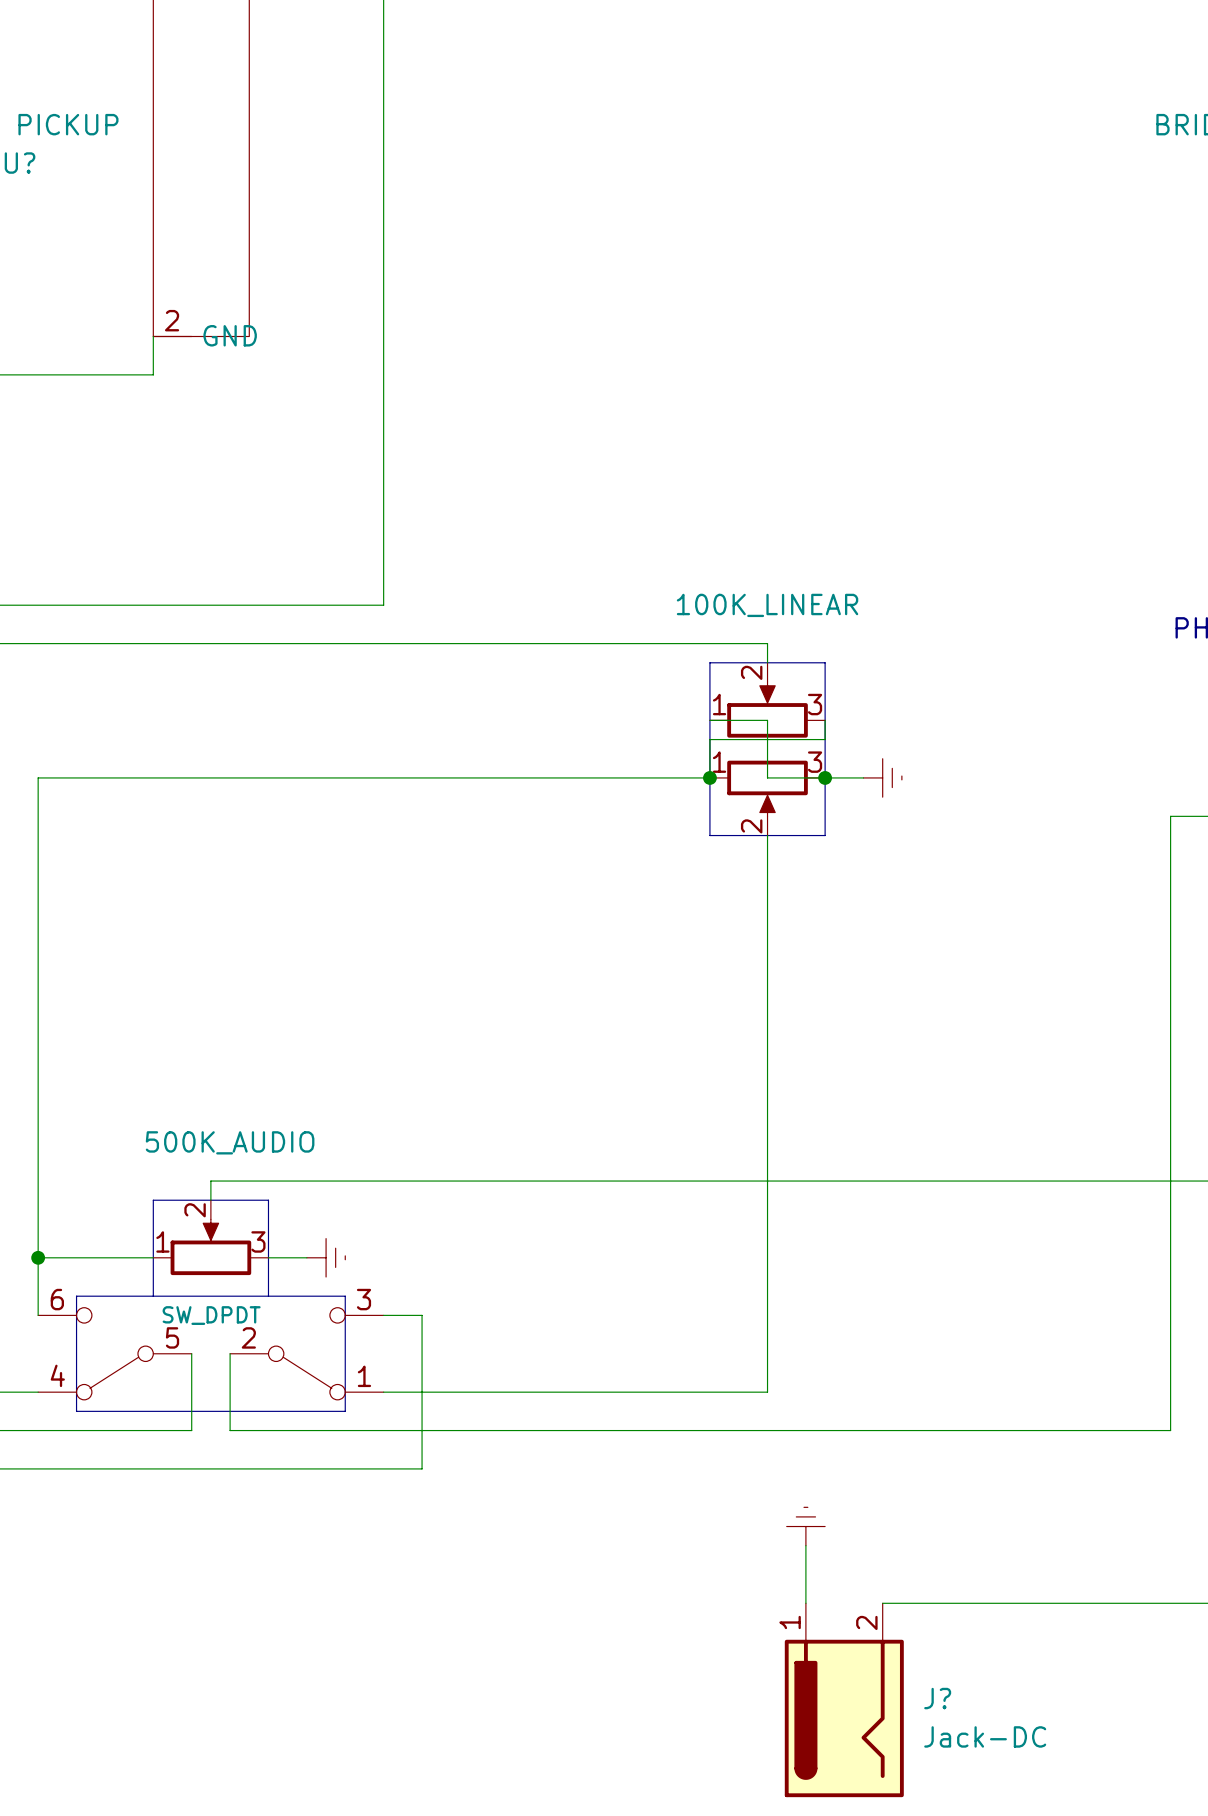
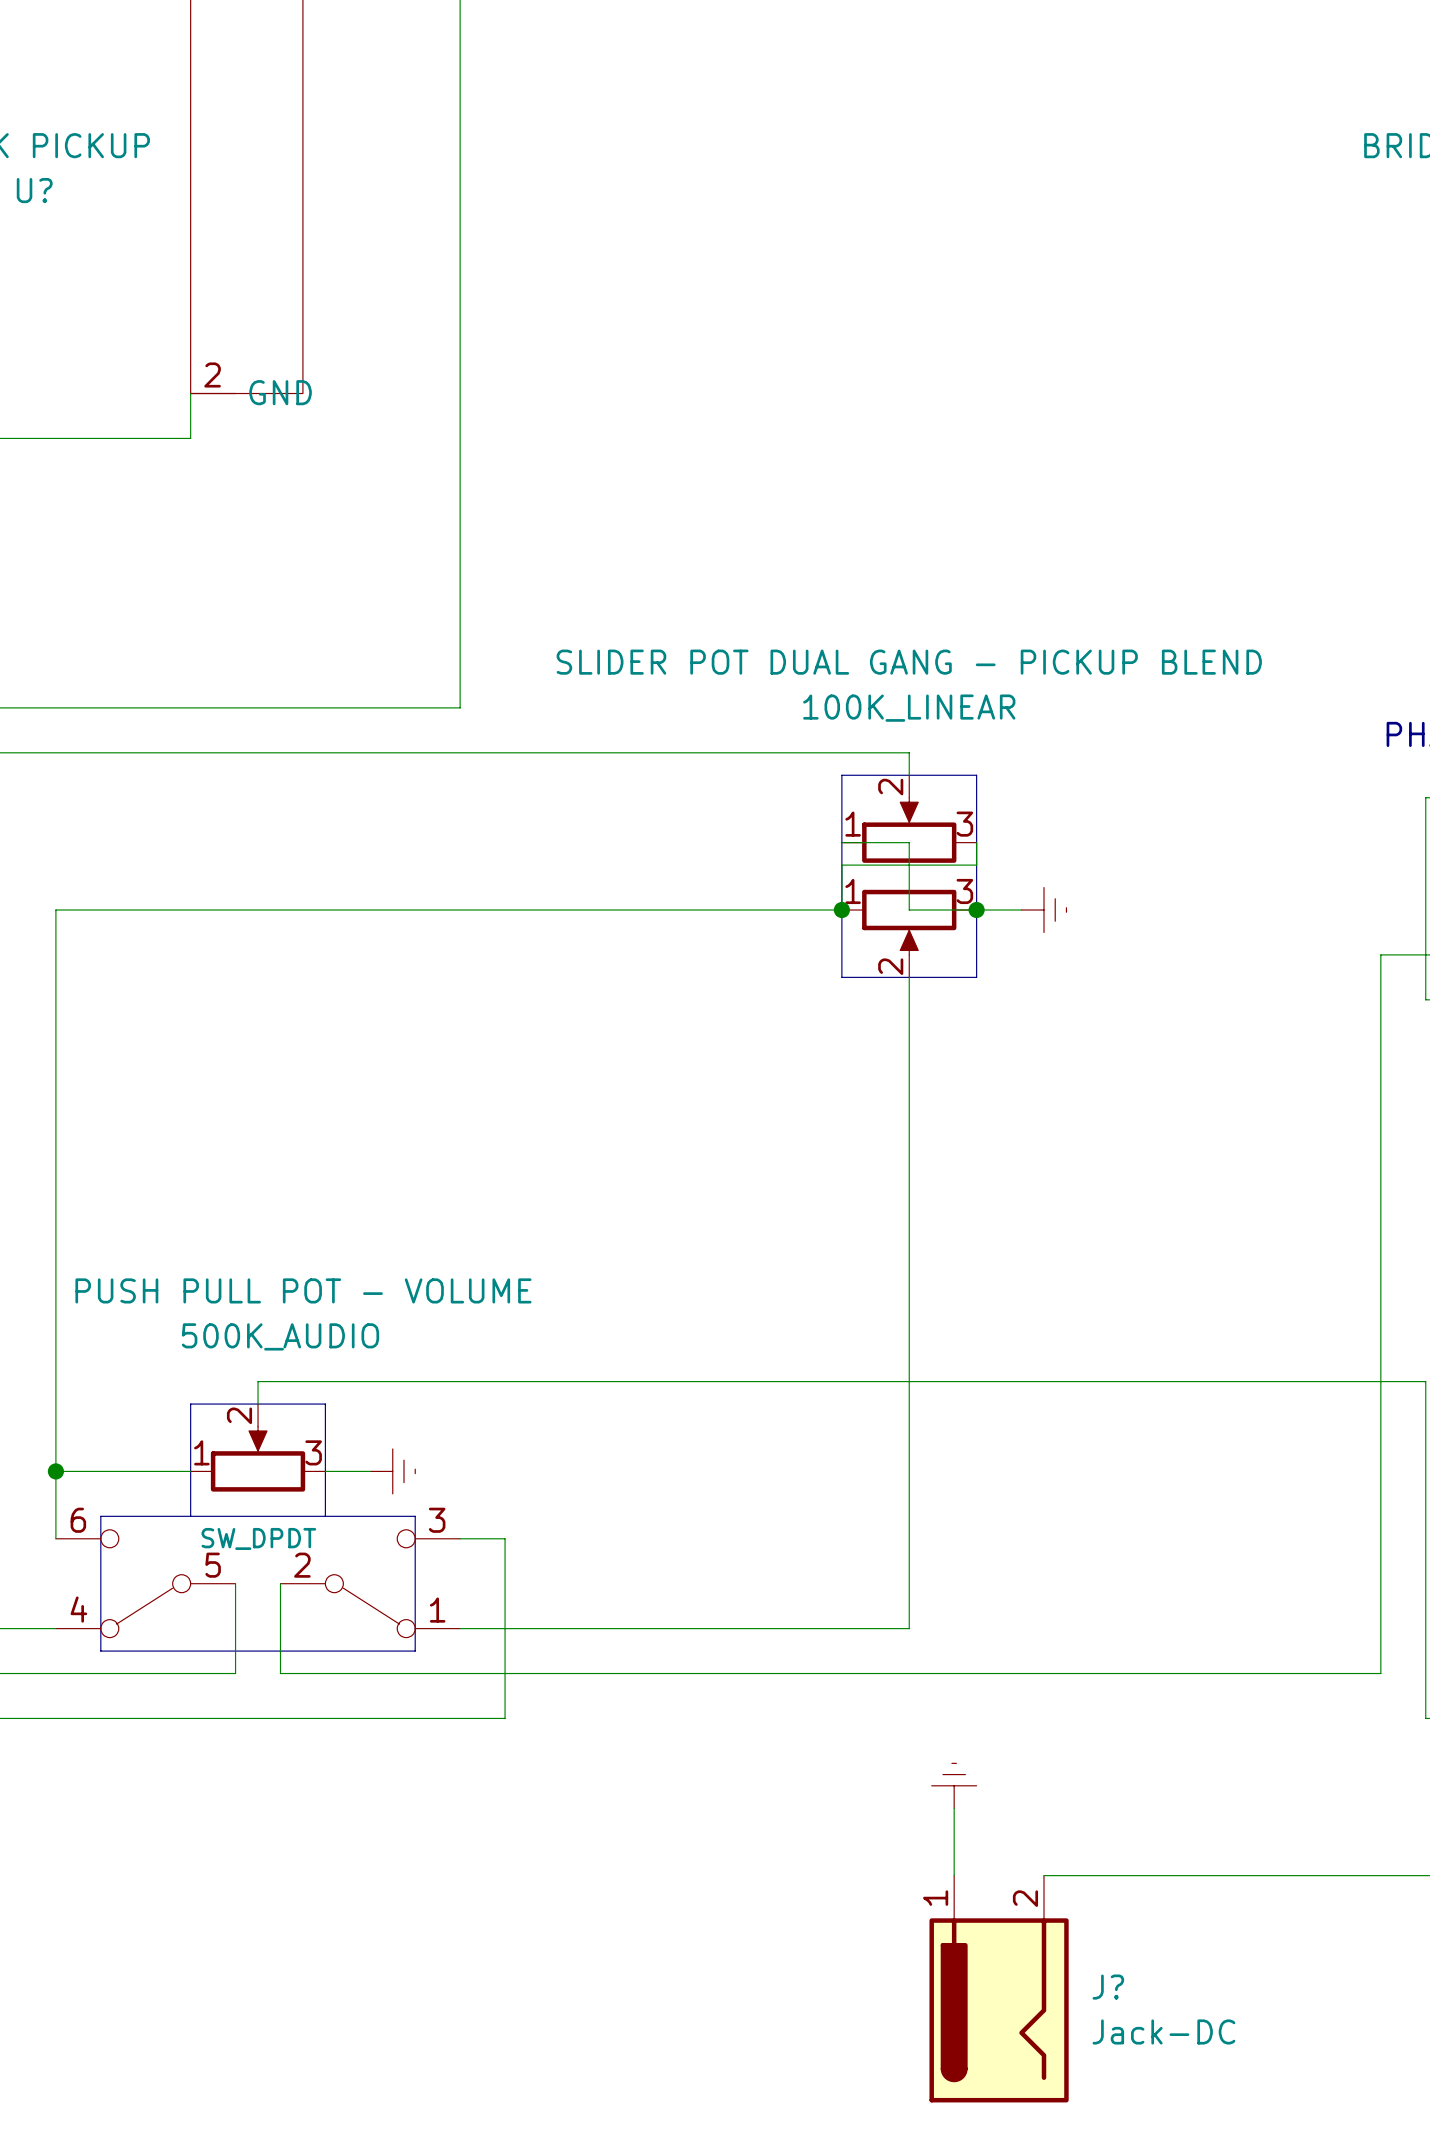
100K_LINEAR value: none -> SLIDER POT DUAL GANG - PICKUP BLEND (909, 662)
500K_AUDIO value: none -> PUSH PULL POT - VOLUME (303, 1290)

